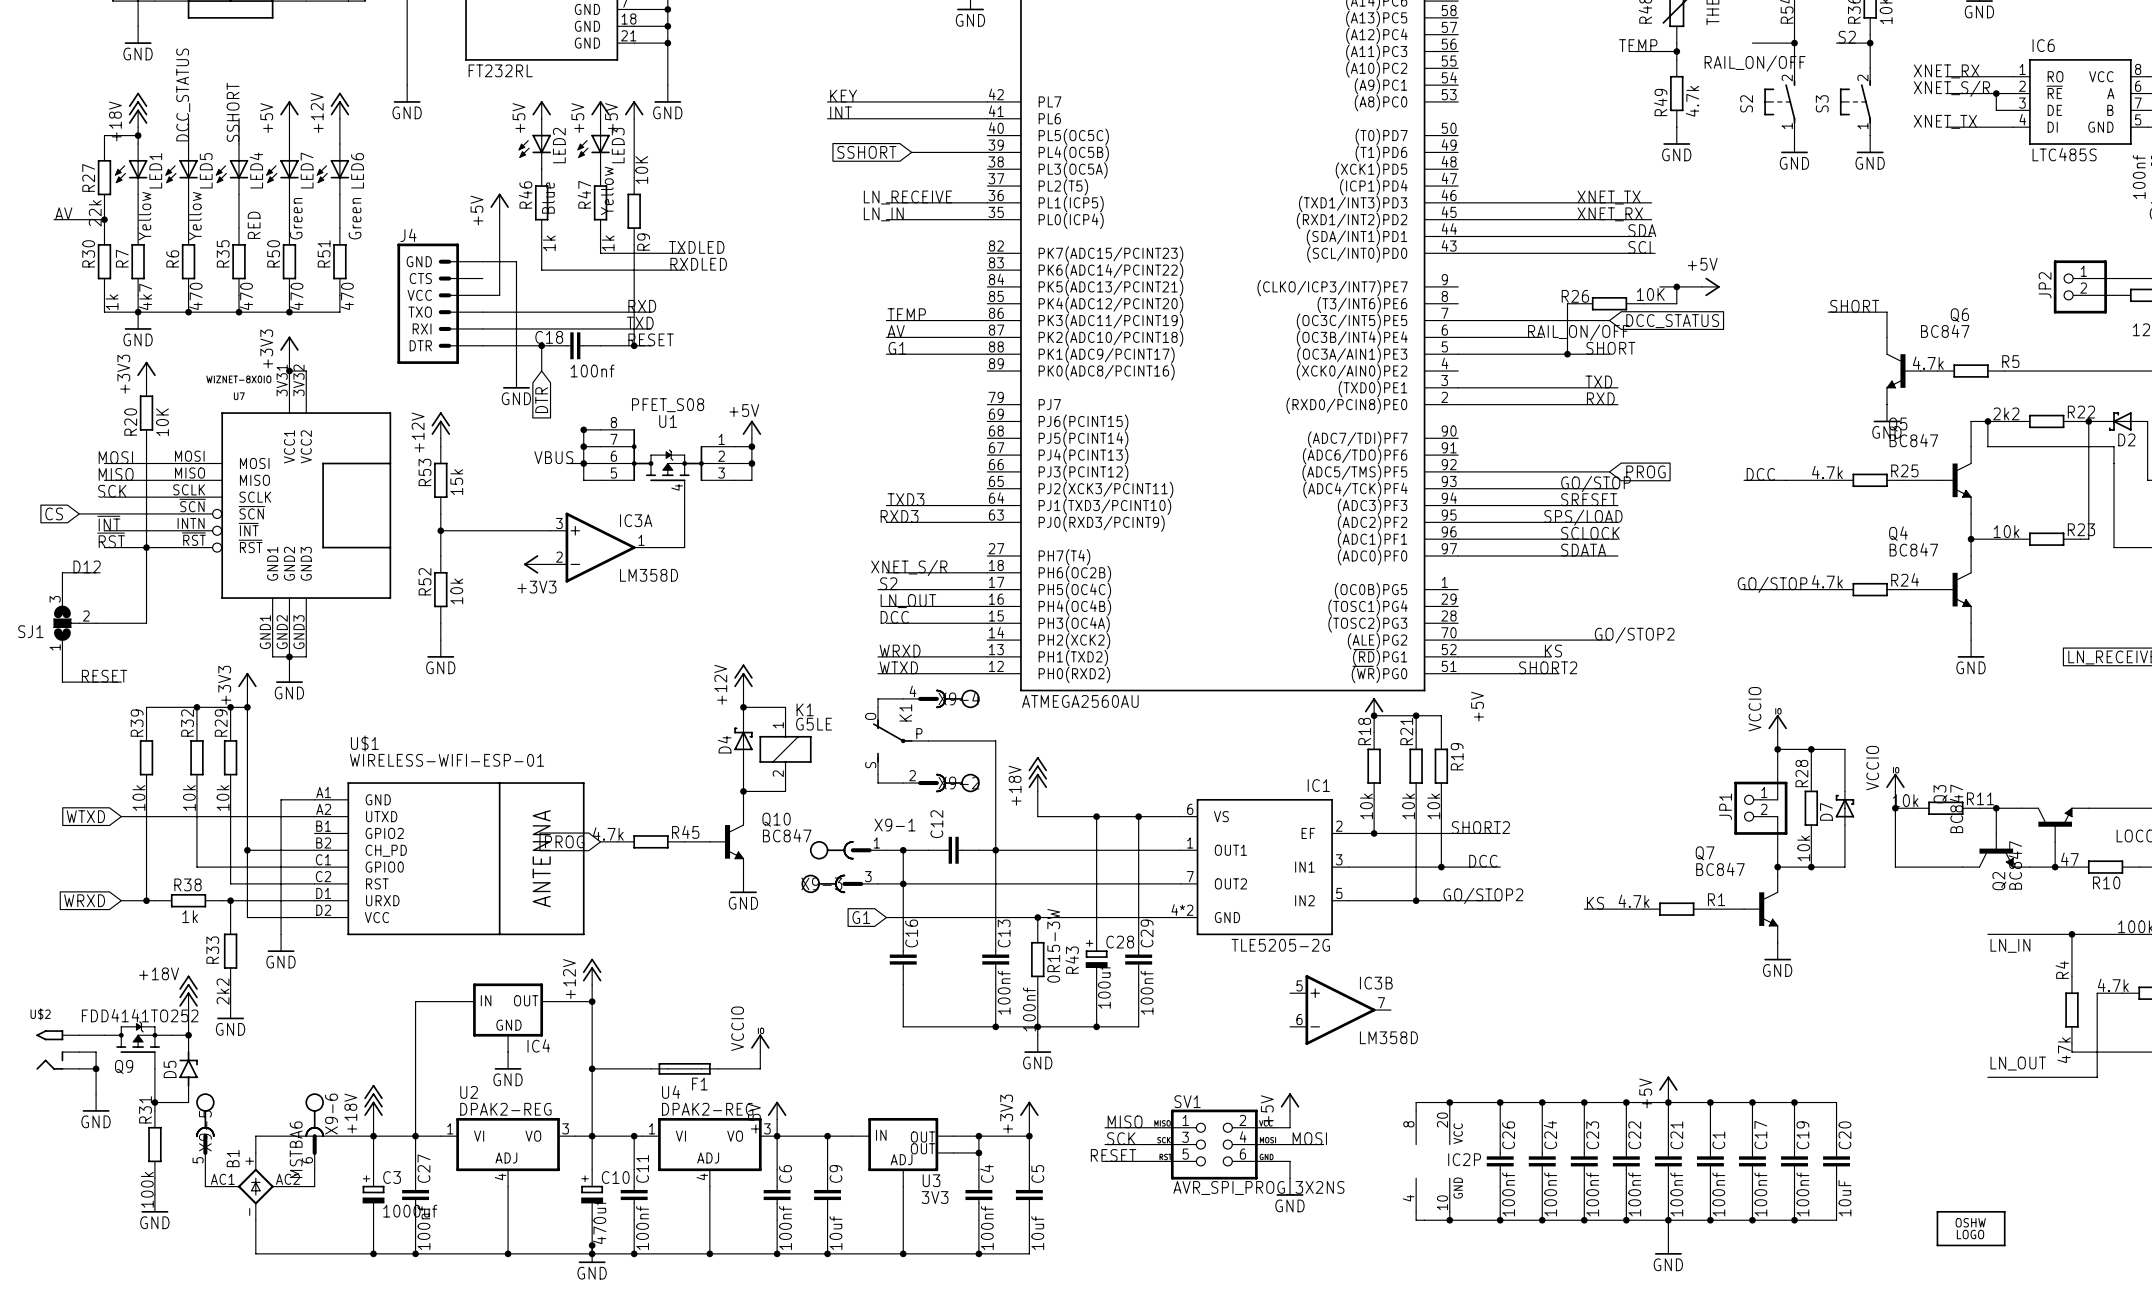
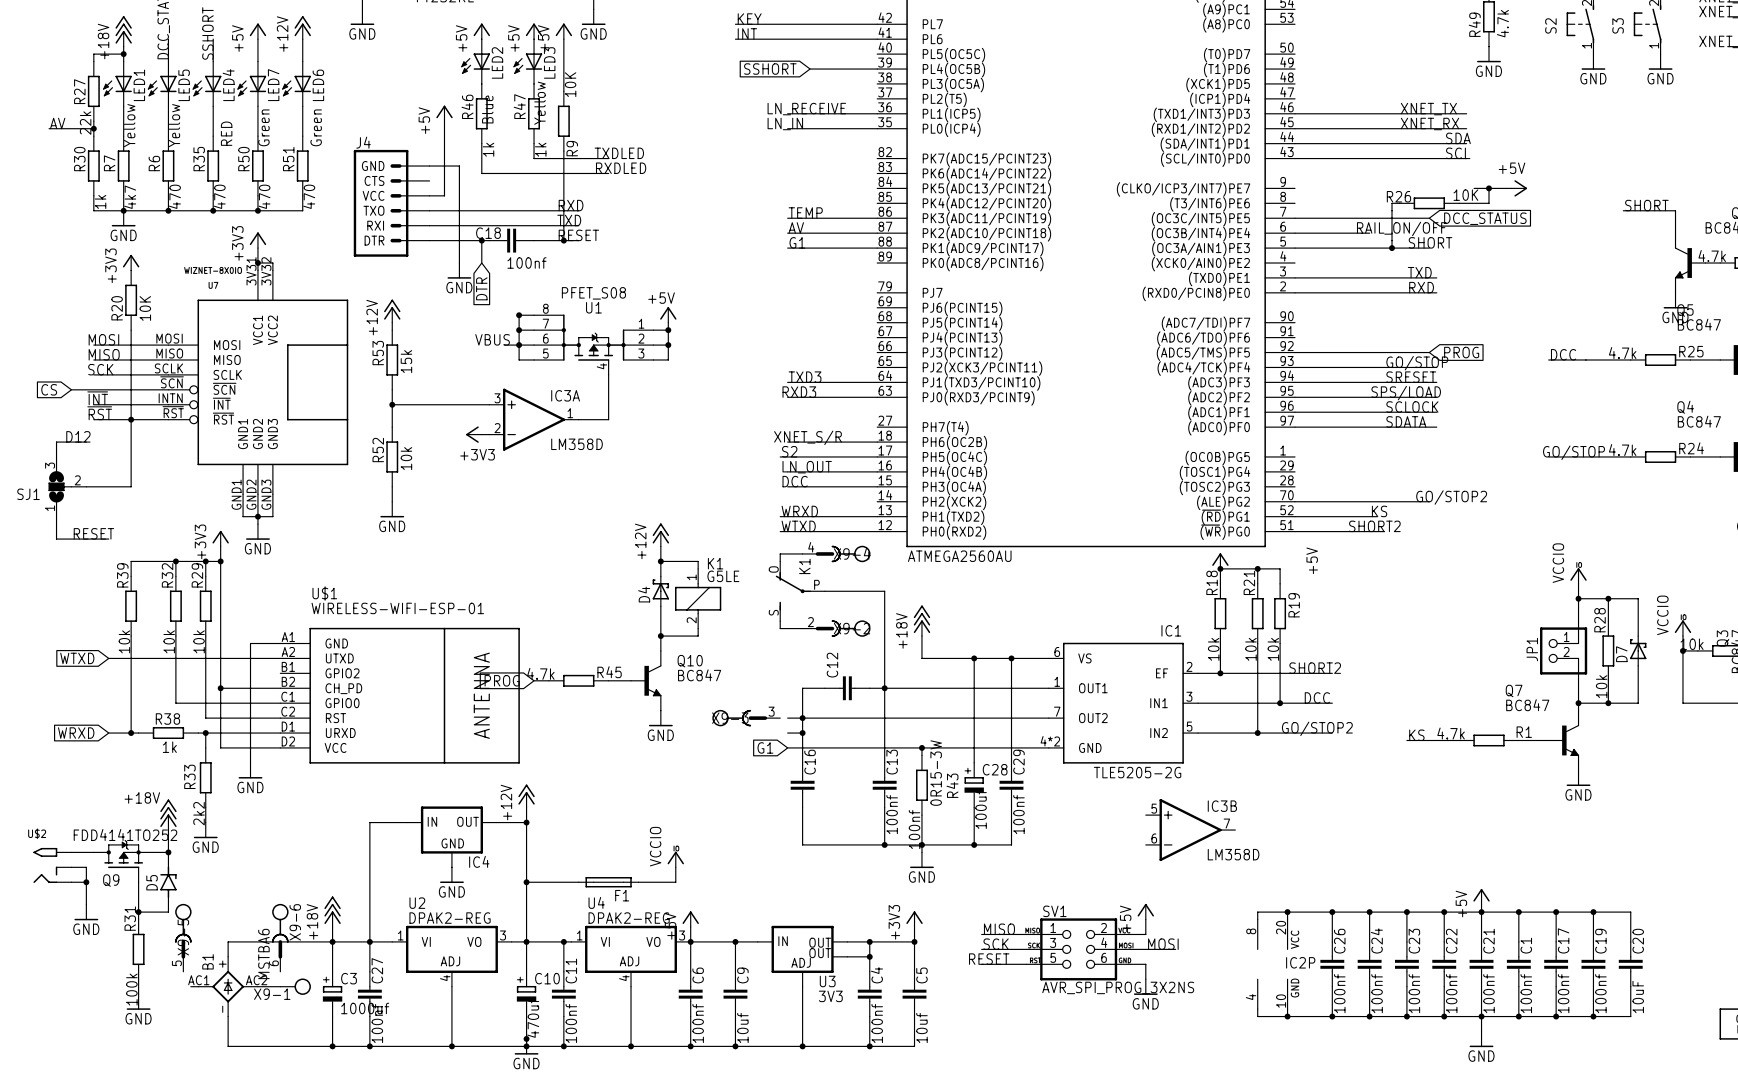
X9-1 name position: X9-1 (895, 825) -> X9-1 (272, 994)
X9-1 symbol: [809, 841, 887, 860] -> [280, 978, 311, 995]
wire: (886, 850) (903, 850) -> (787, 733) (802, 733)
junction: (903, 850) -> none
wire: (878, 883) (886, 883) -> none
junction: none -> (802, 733)
wire: (205, 1169) (205, 1186) (213, 1186) -> none
wire: (314, 1169) (314, 1186) -> none

